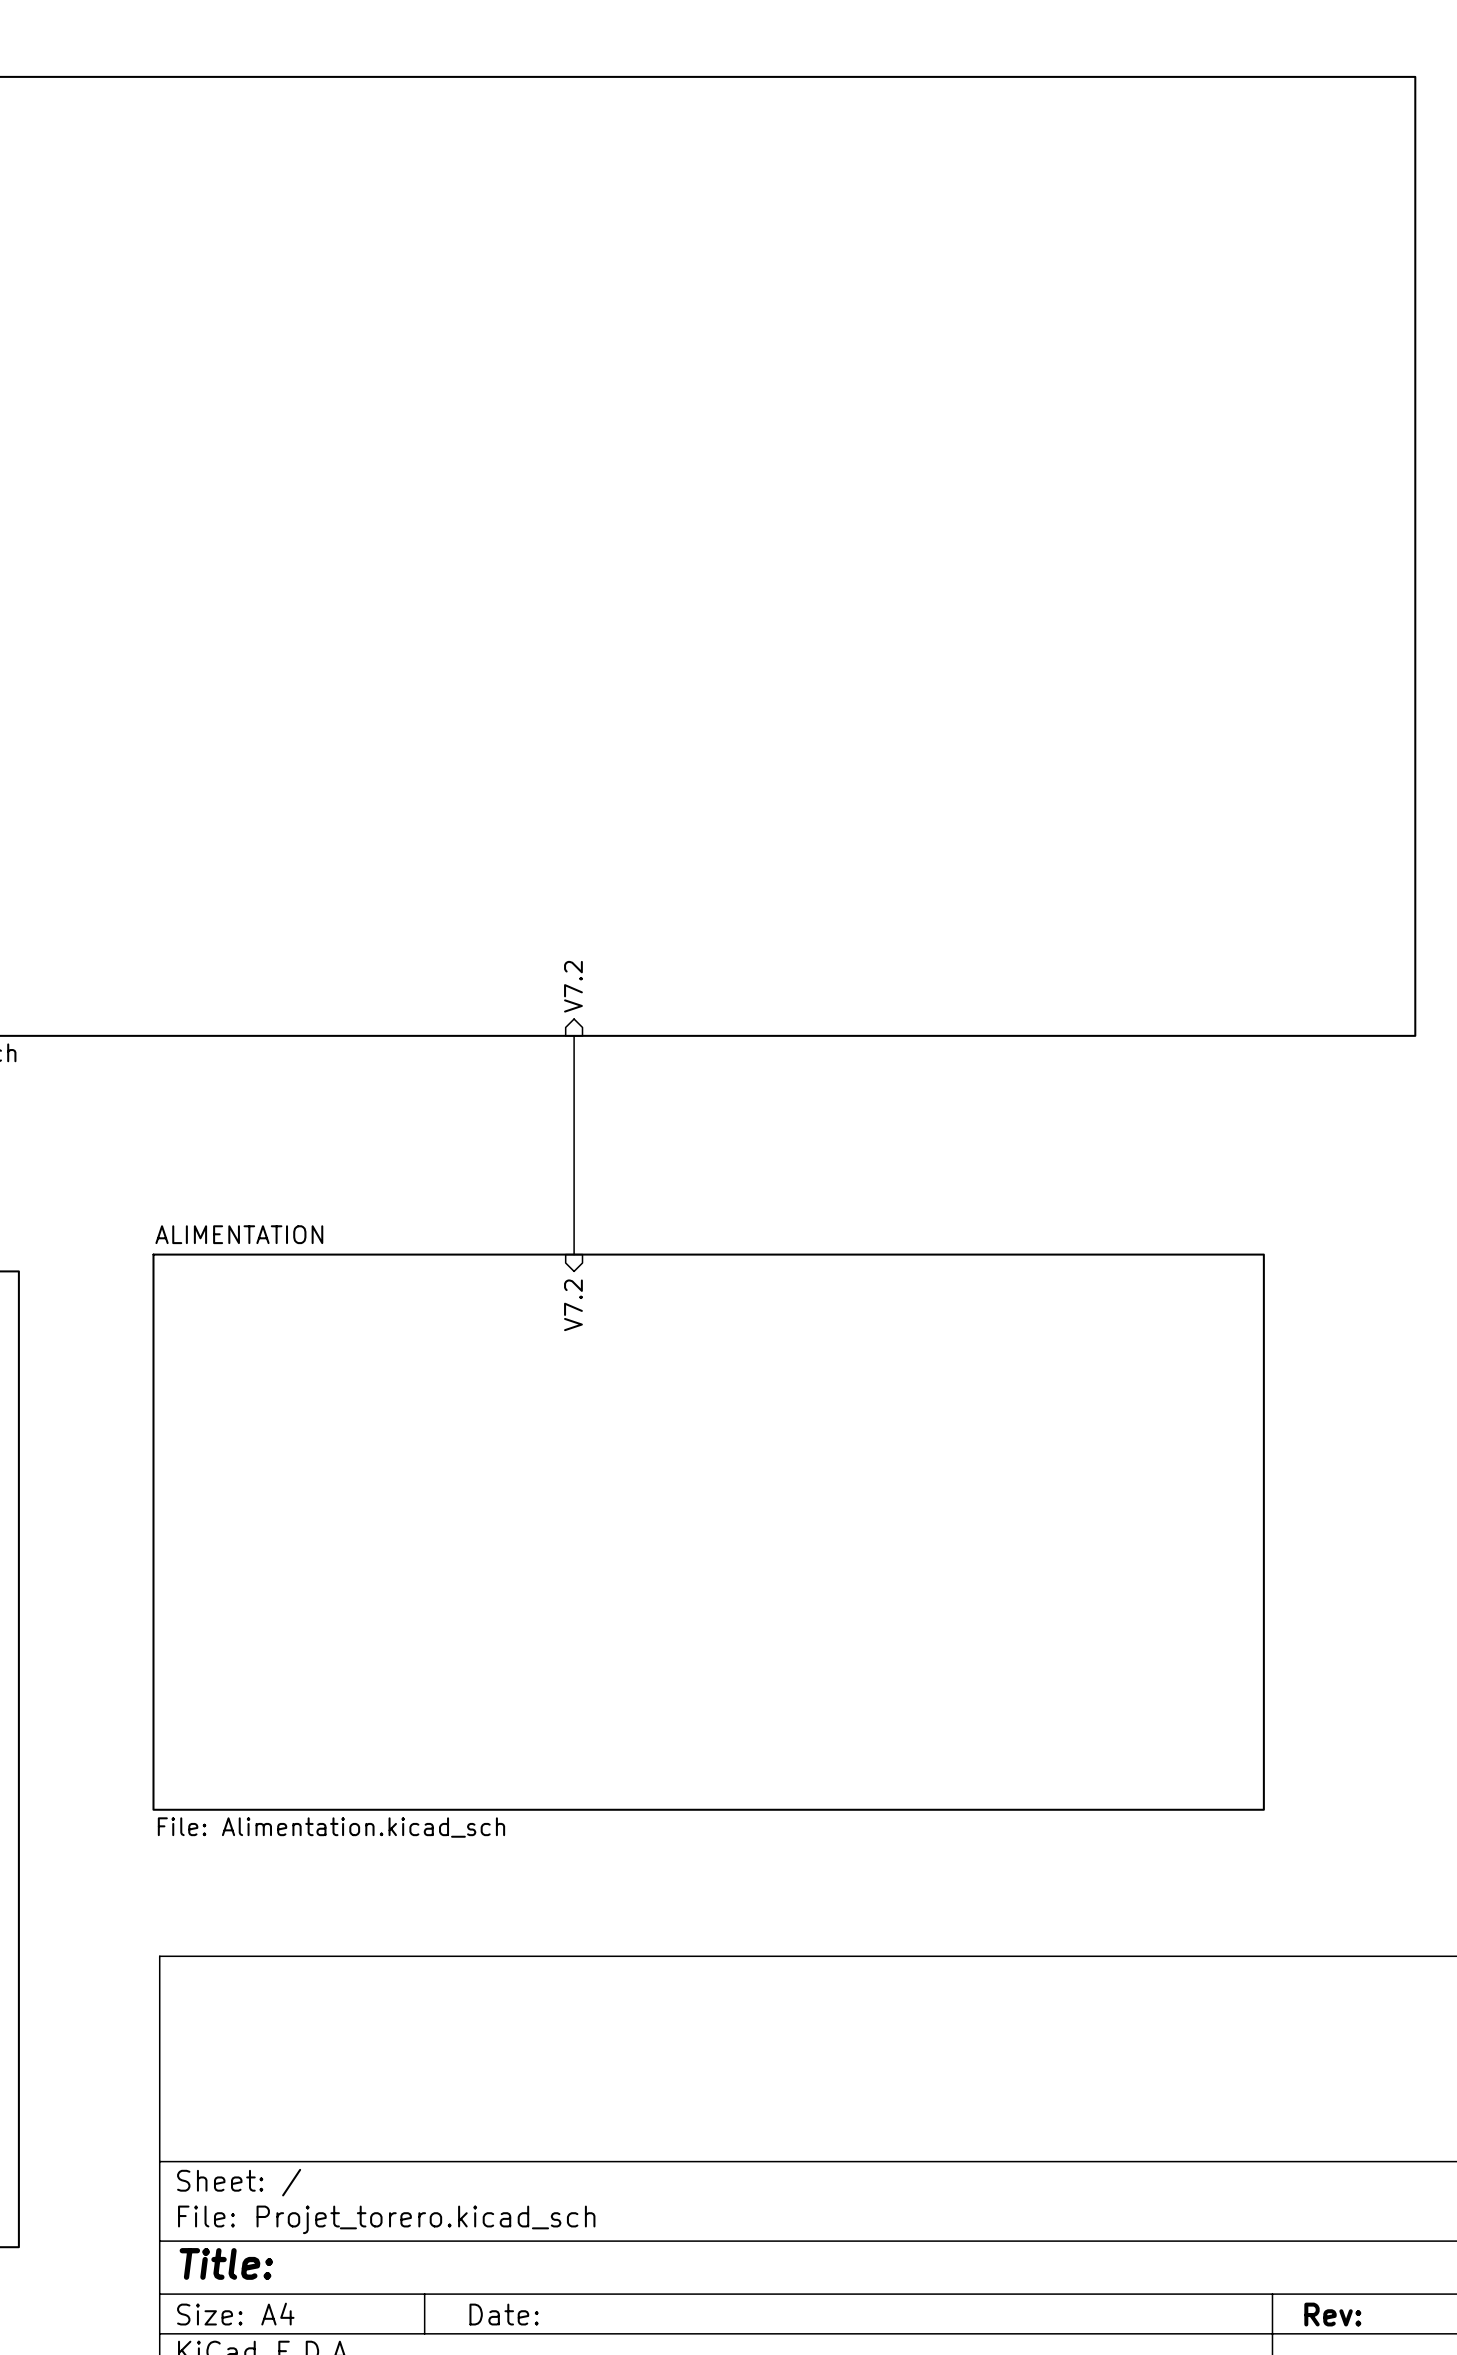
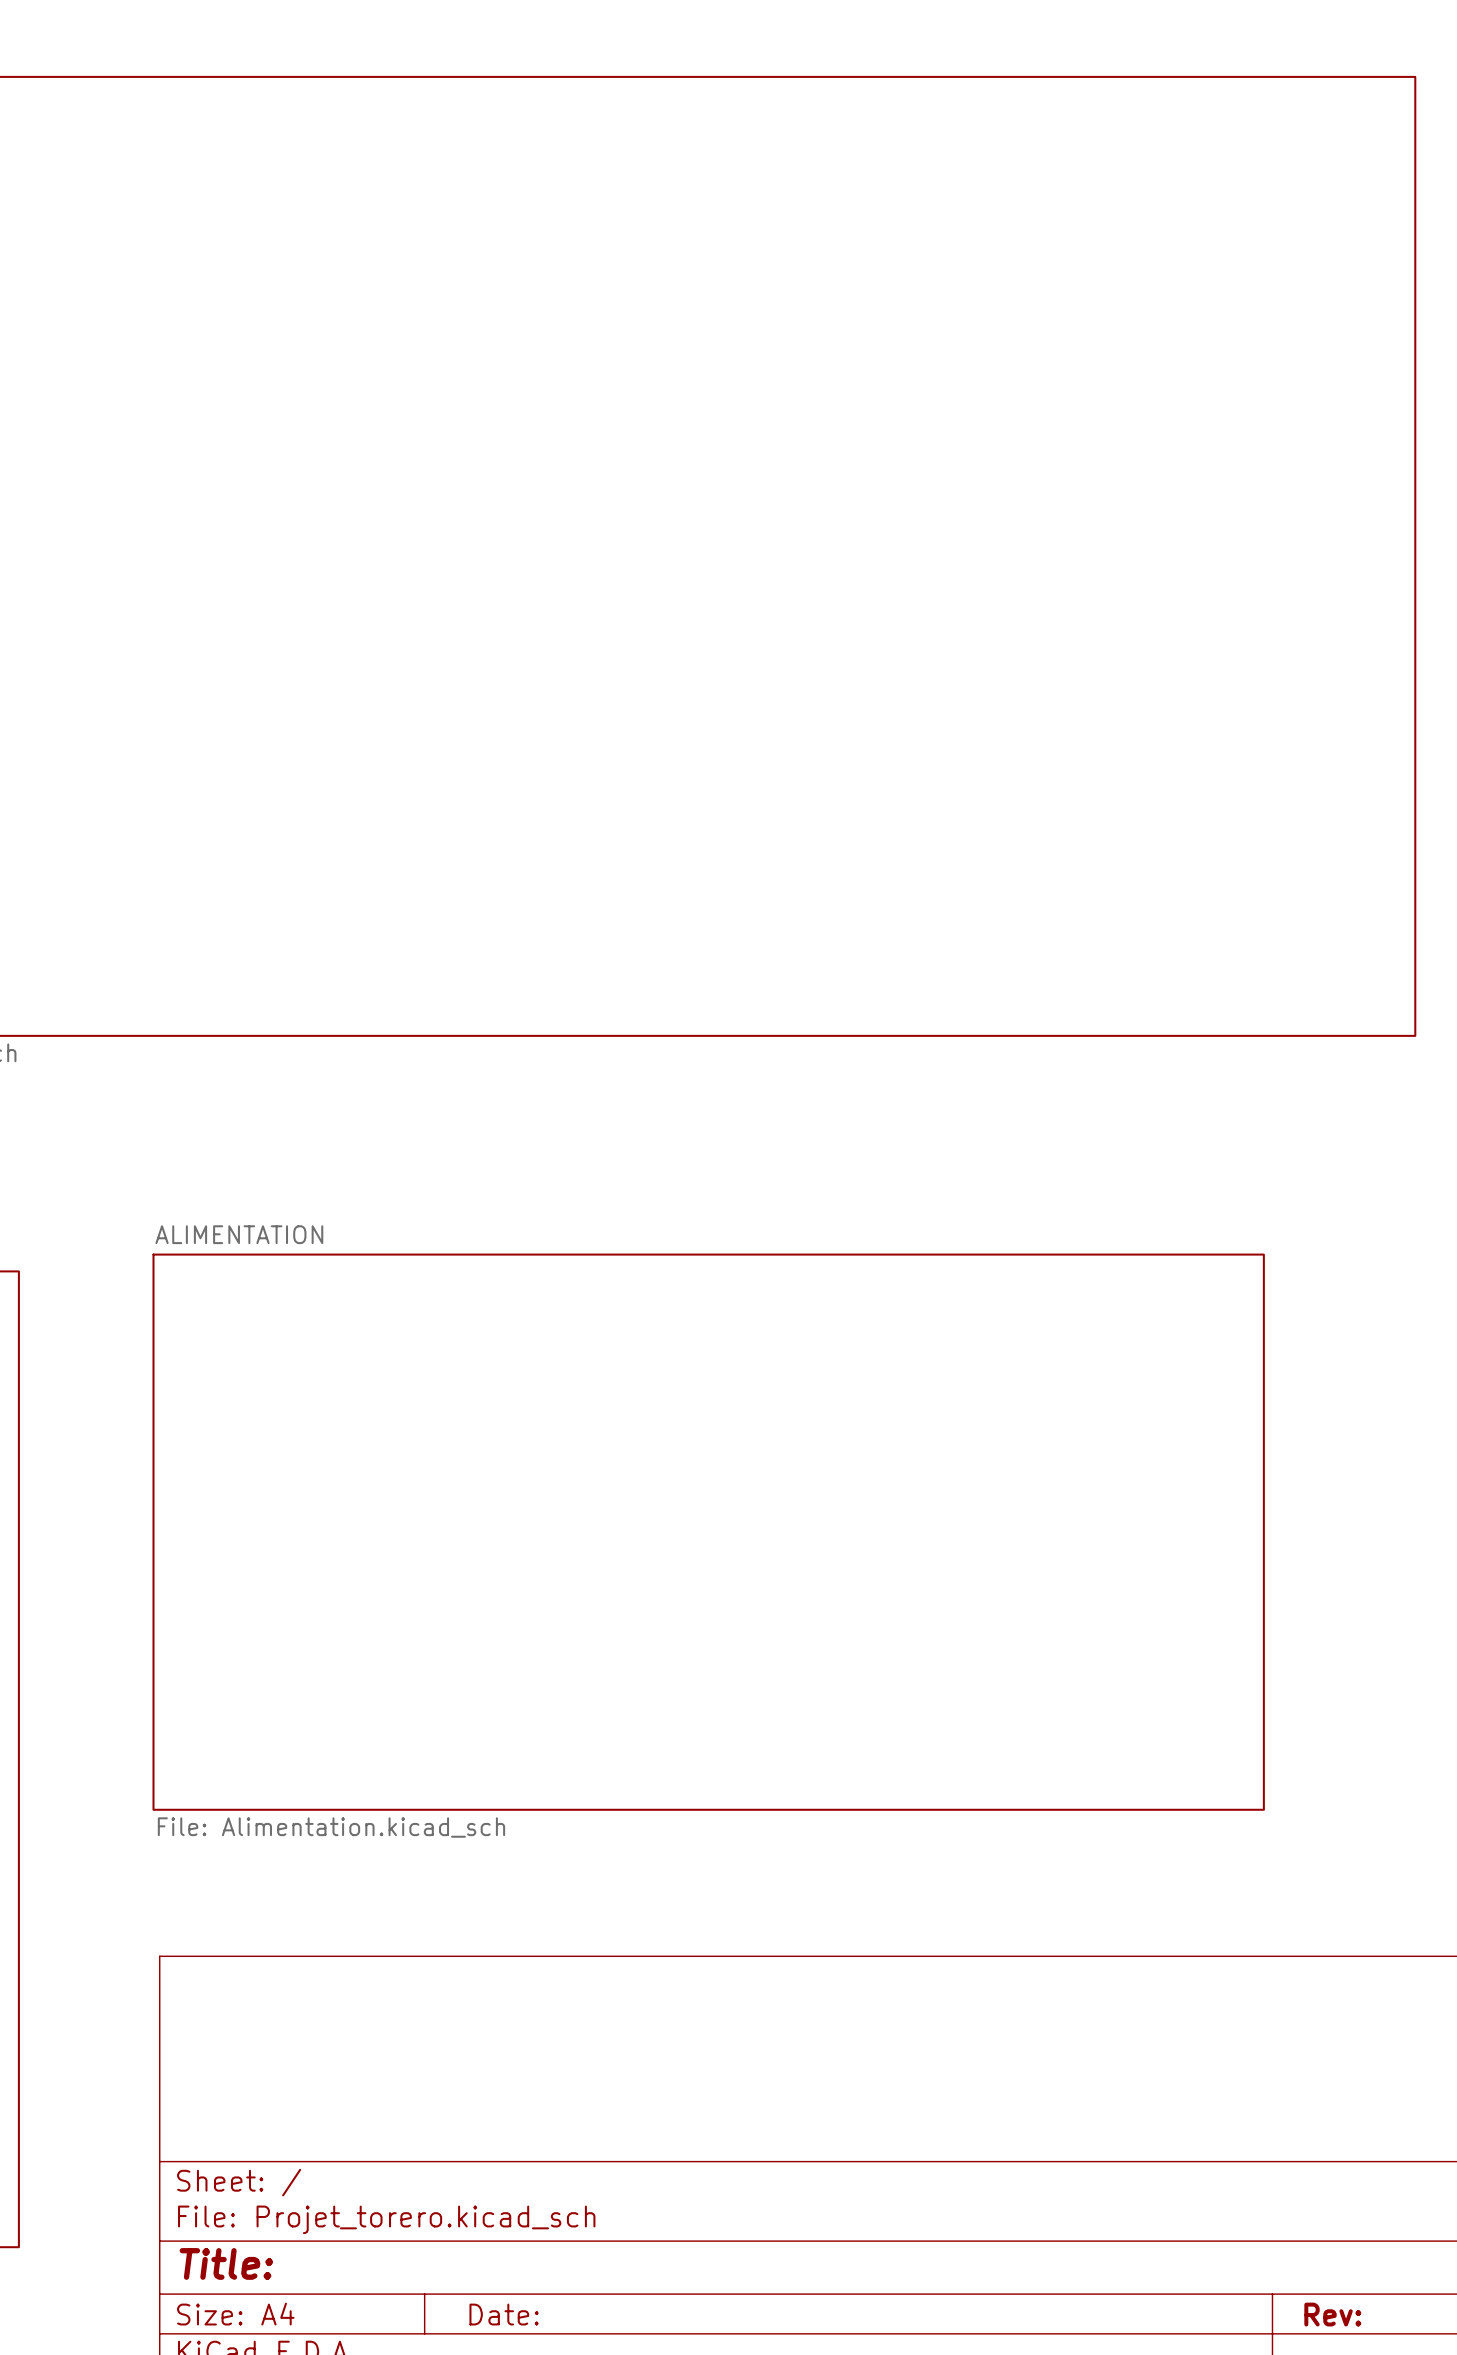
sheet pin: V7.2 (573, 986) -> none
wire: (574, 1035) (574, 1254) -> none
sheet pin: V7.2 (573, 1305) -> none

